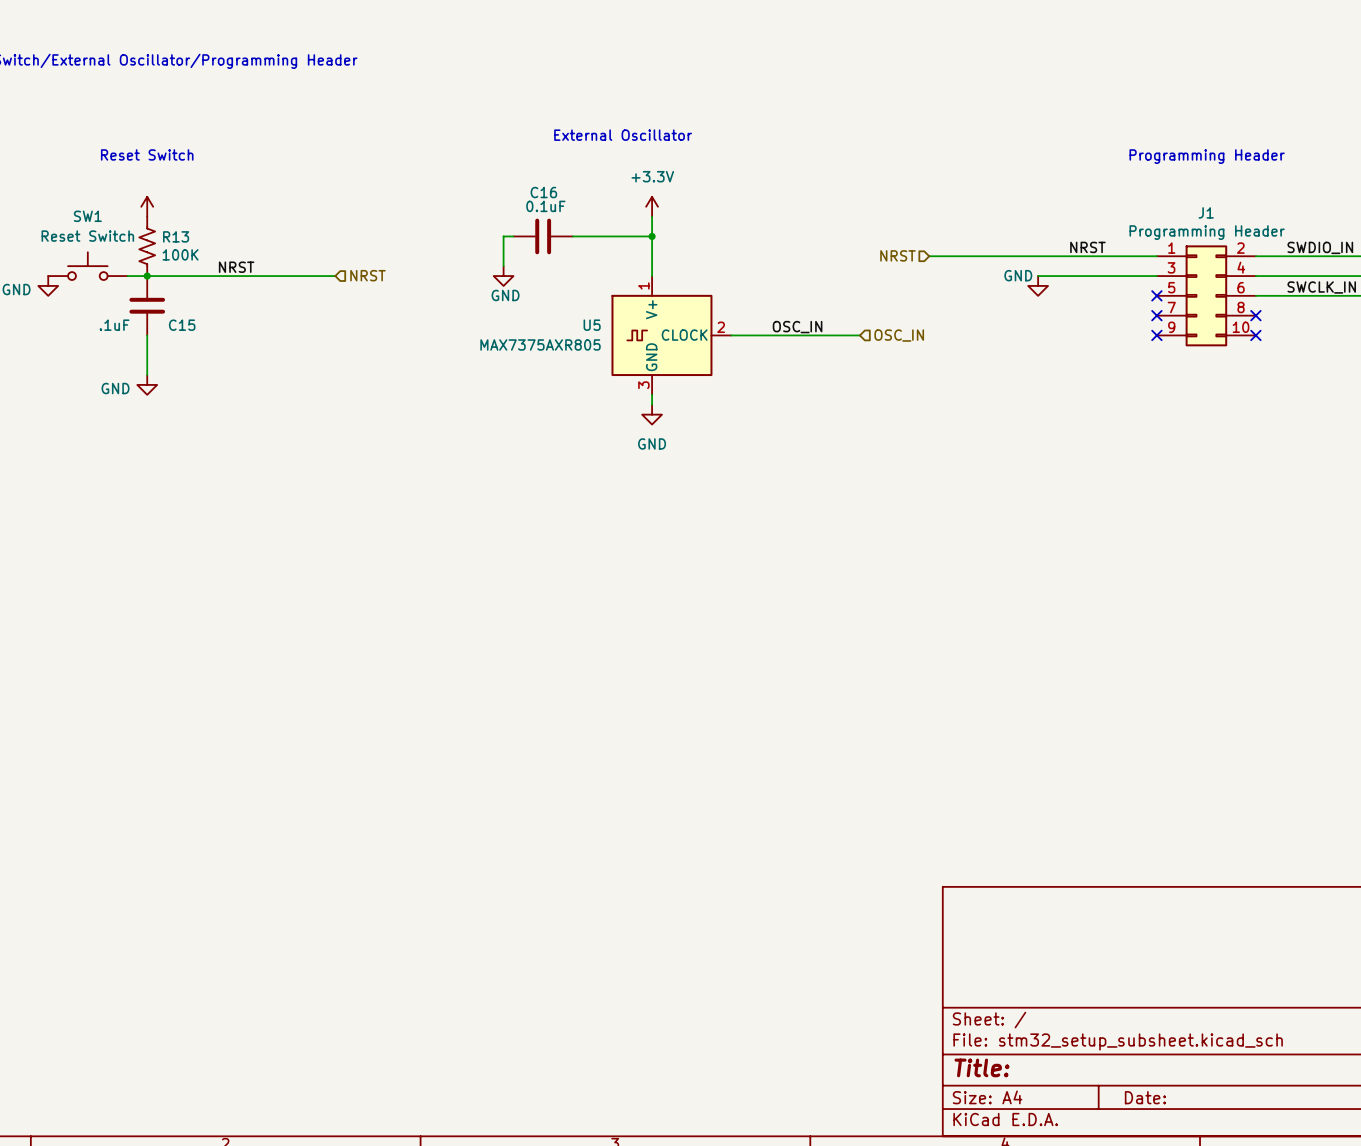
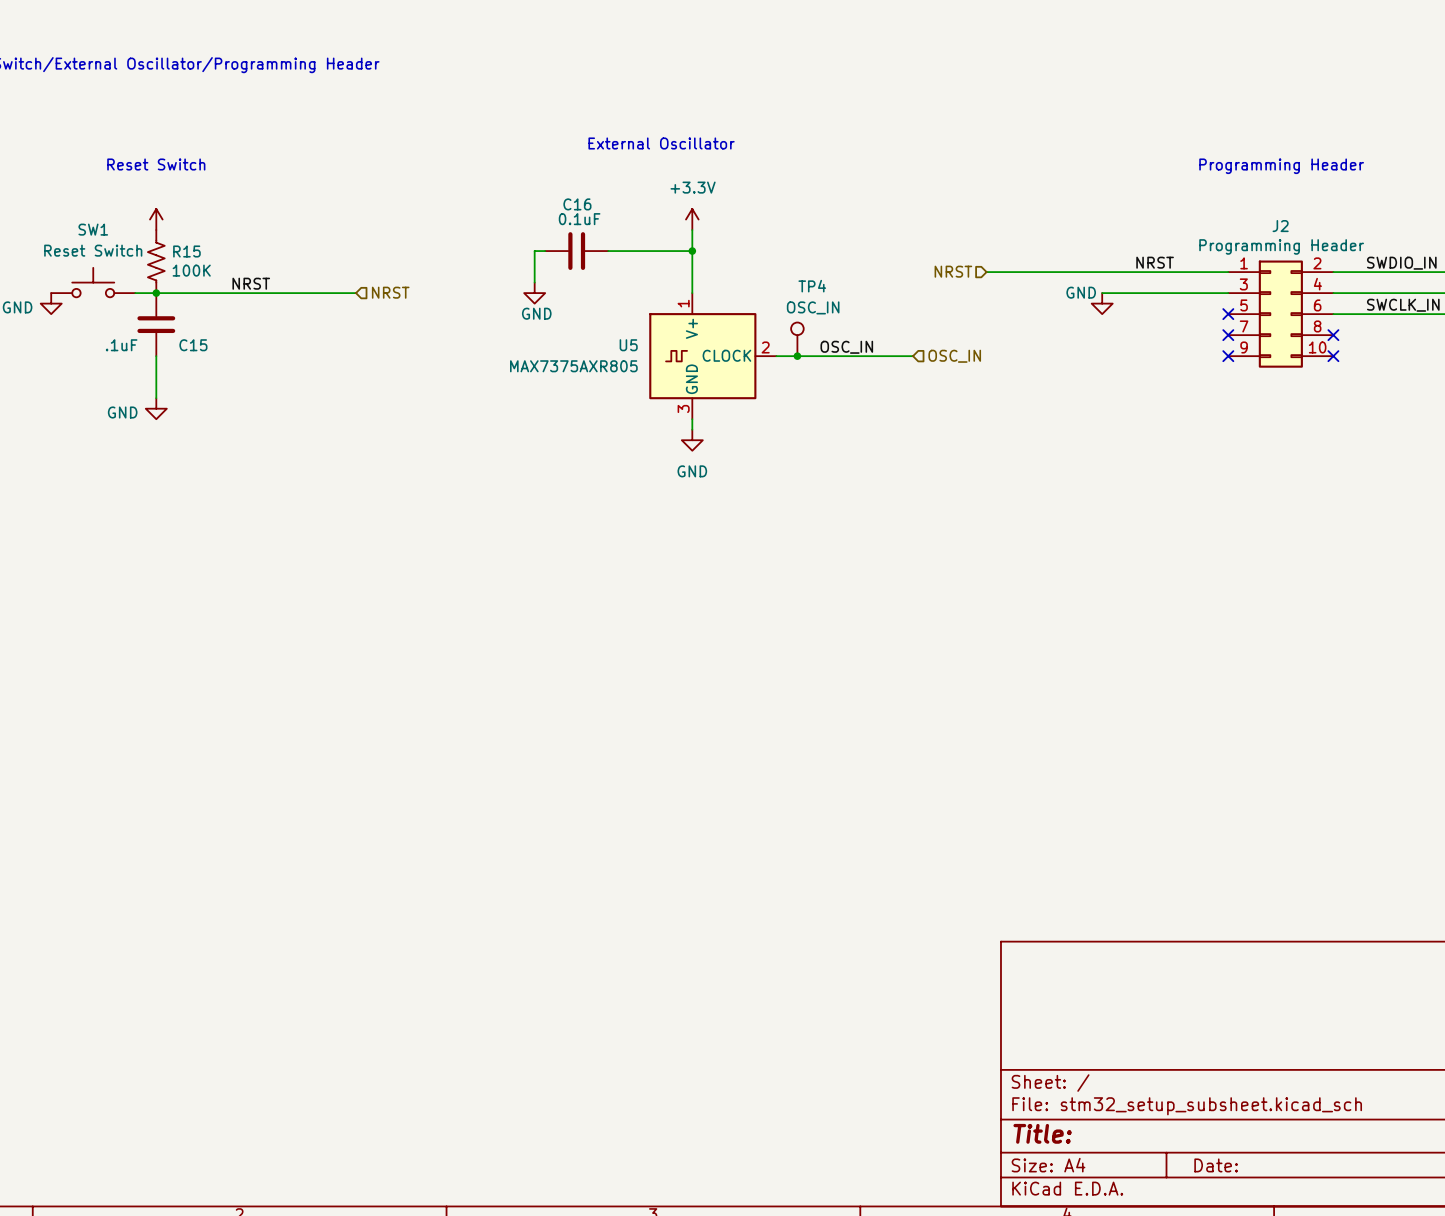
J1 name: J1 (1206, 212) -> J2 (1280, 226)
R13 name: R13 (176, 236) -> R15 (186, 251)
TP4: none -> OSC_IN (797, 339)
junction: none -> (797, 356)

